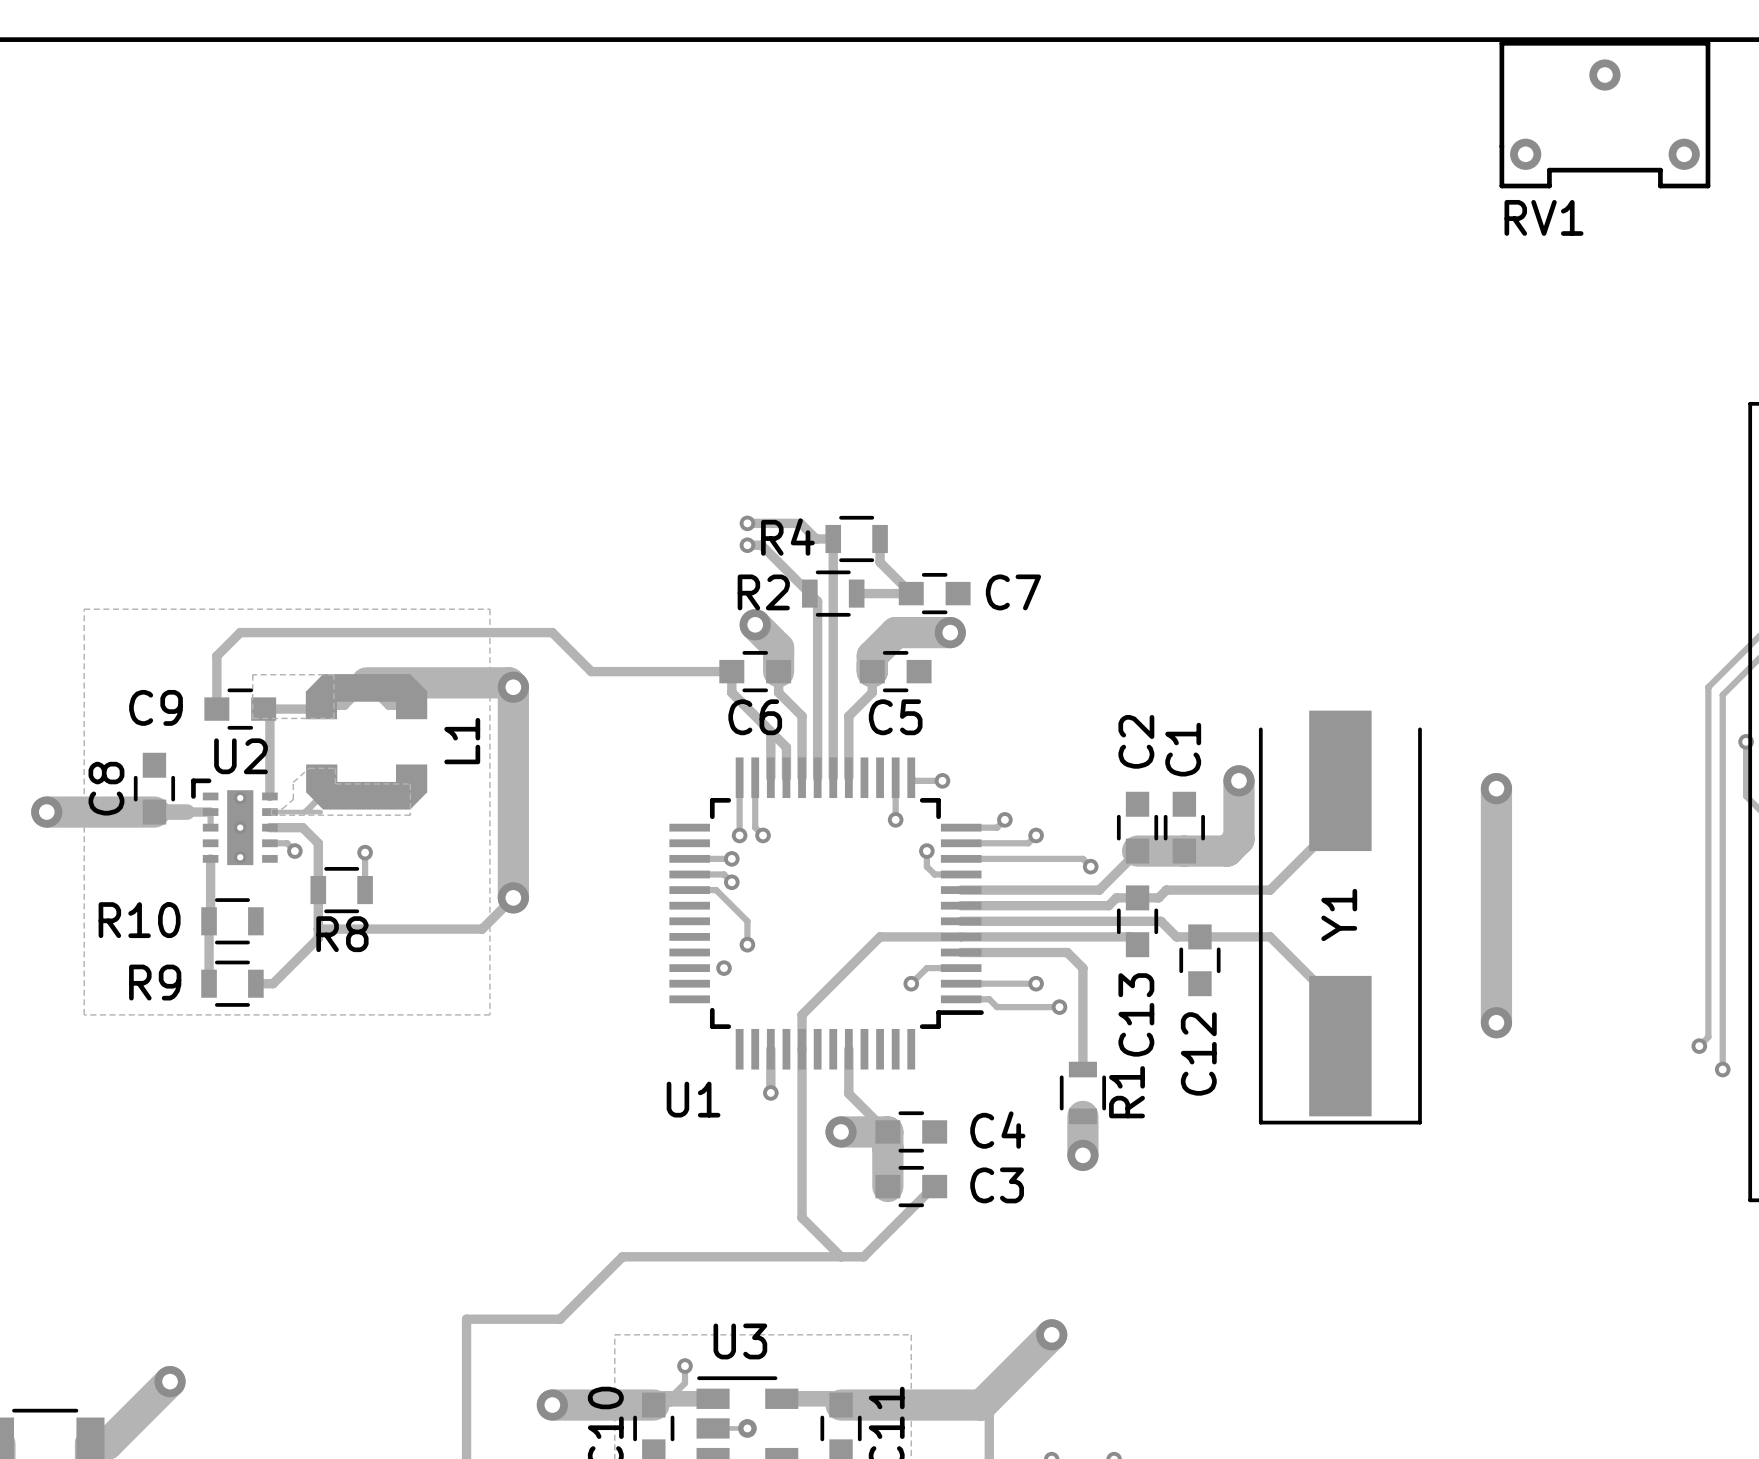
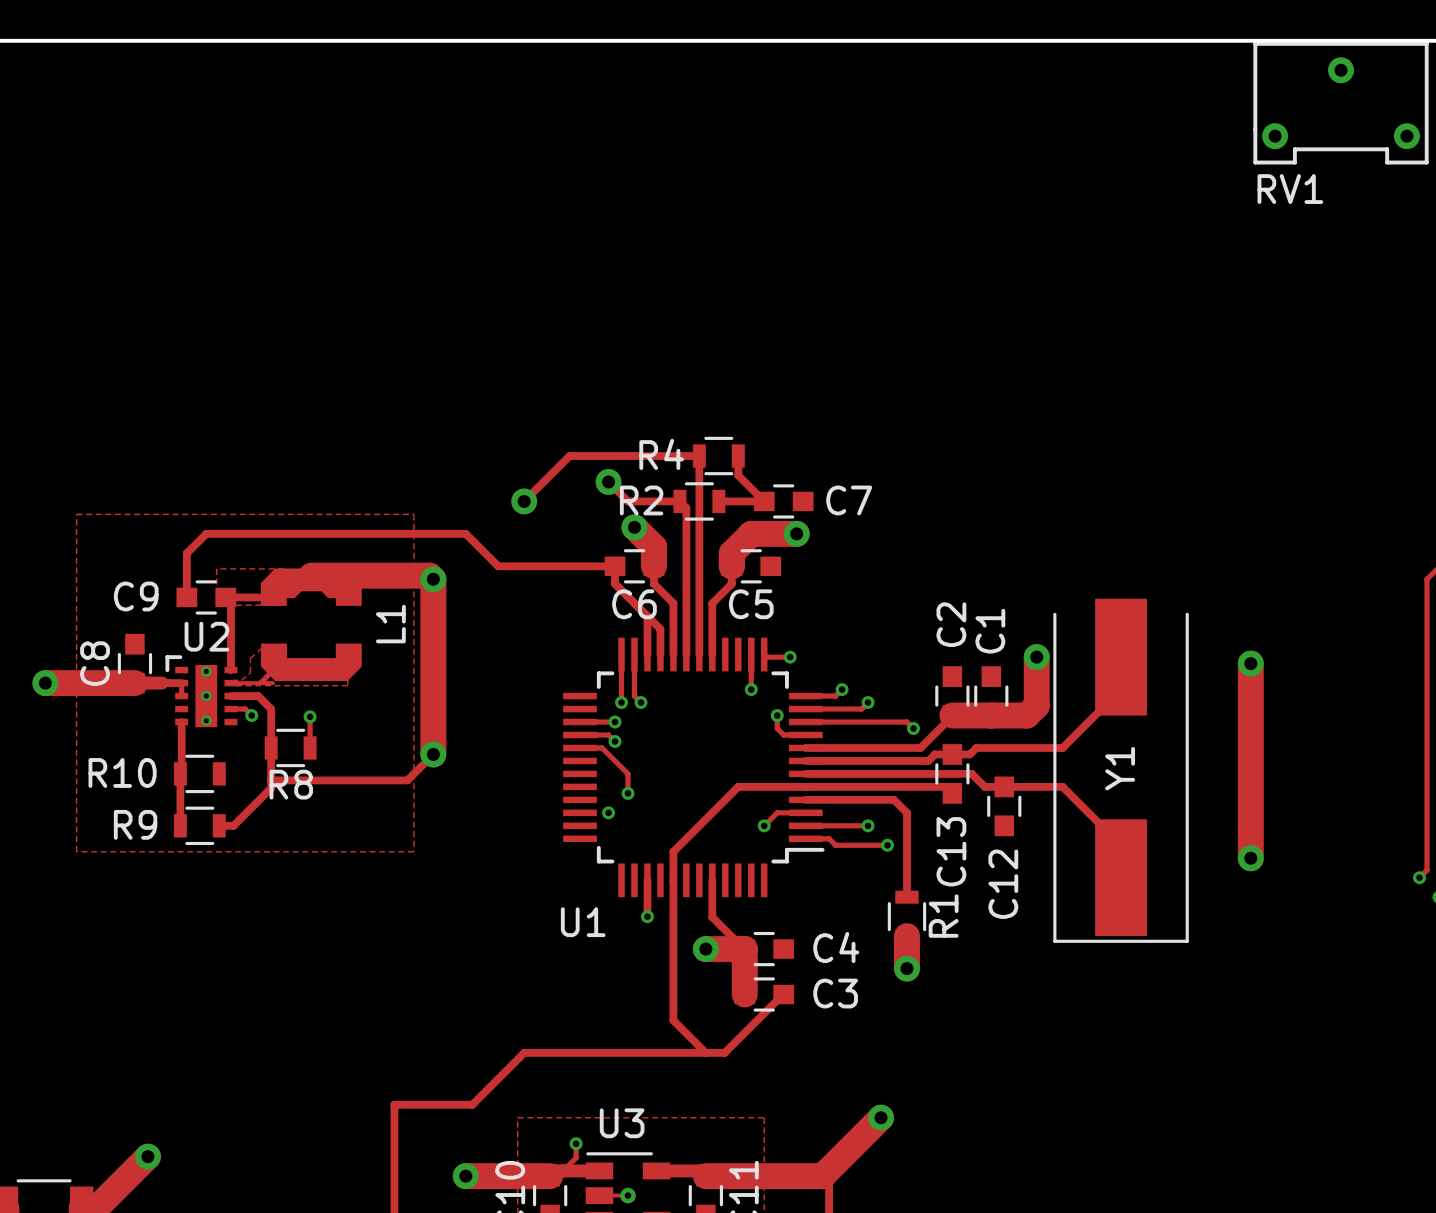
track: (747, 523) (800, 523) (816, 538) -> (524, 501) (569, 456) (685, 456)
via: (747, 523) -> none
track: (747, 545) (761, 545) (809, 593) -> (608, 481) (628, 501) (679, 501)
via: (747, 545) -> none
via: none -> (608, 481)
via: none -> (524, 501)

